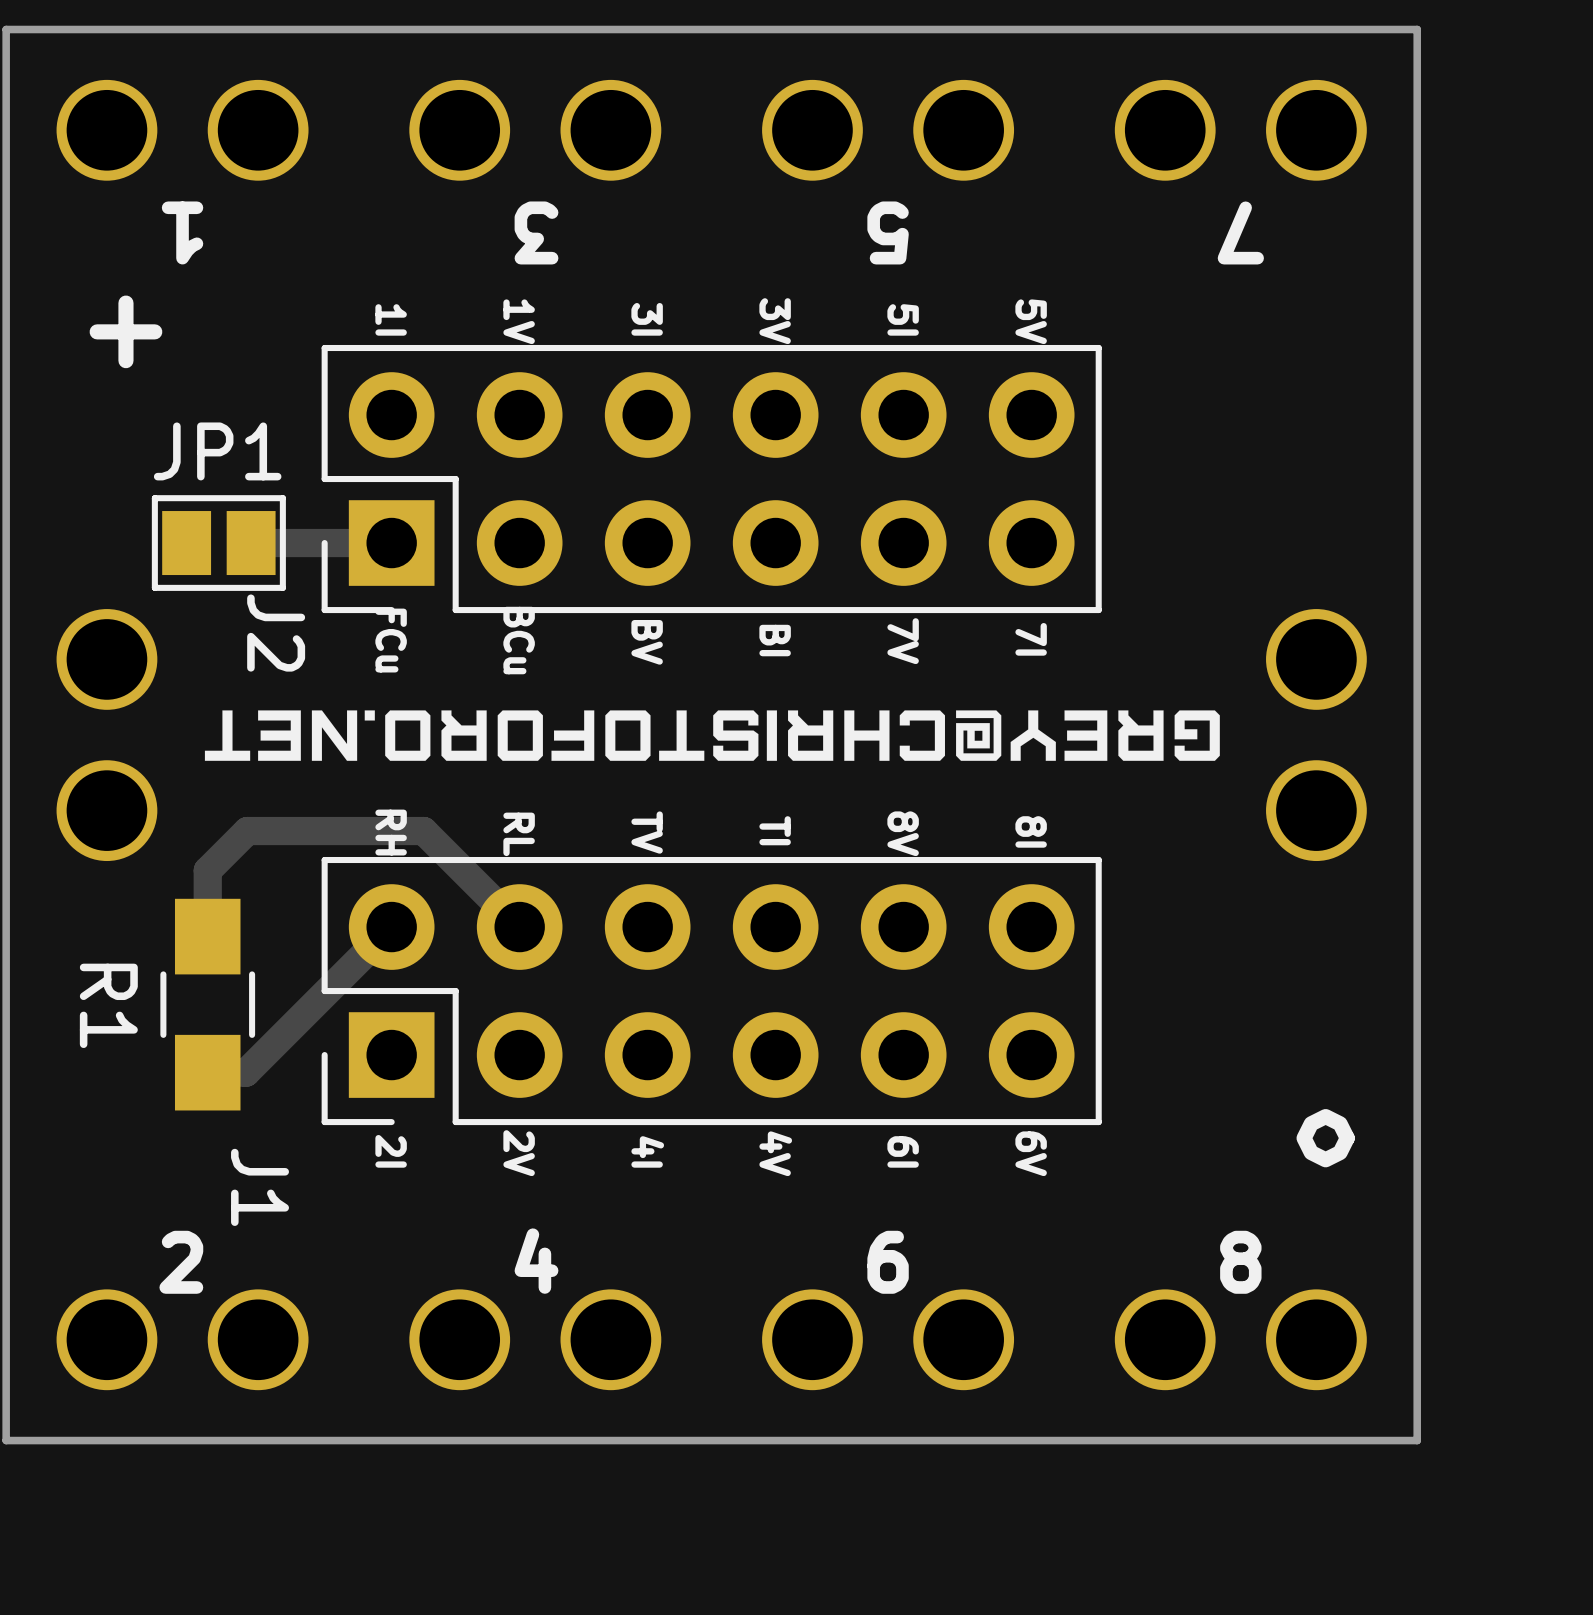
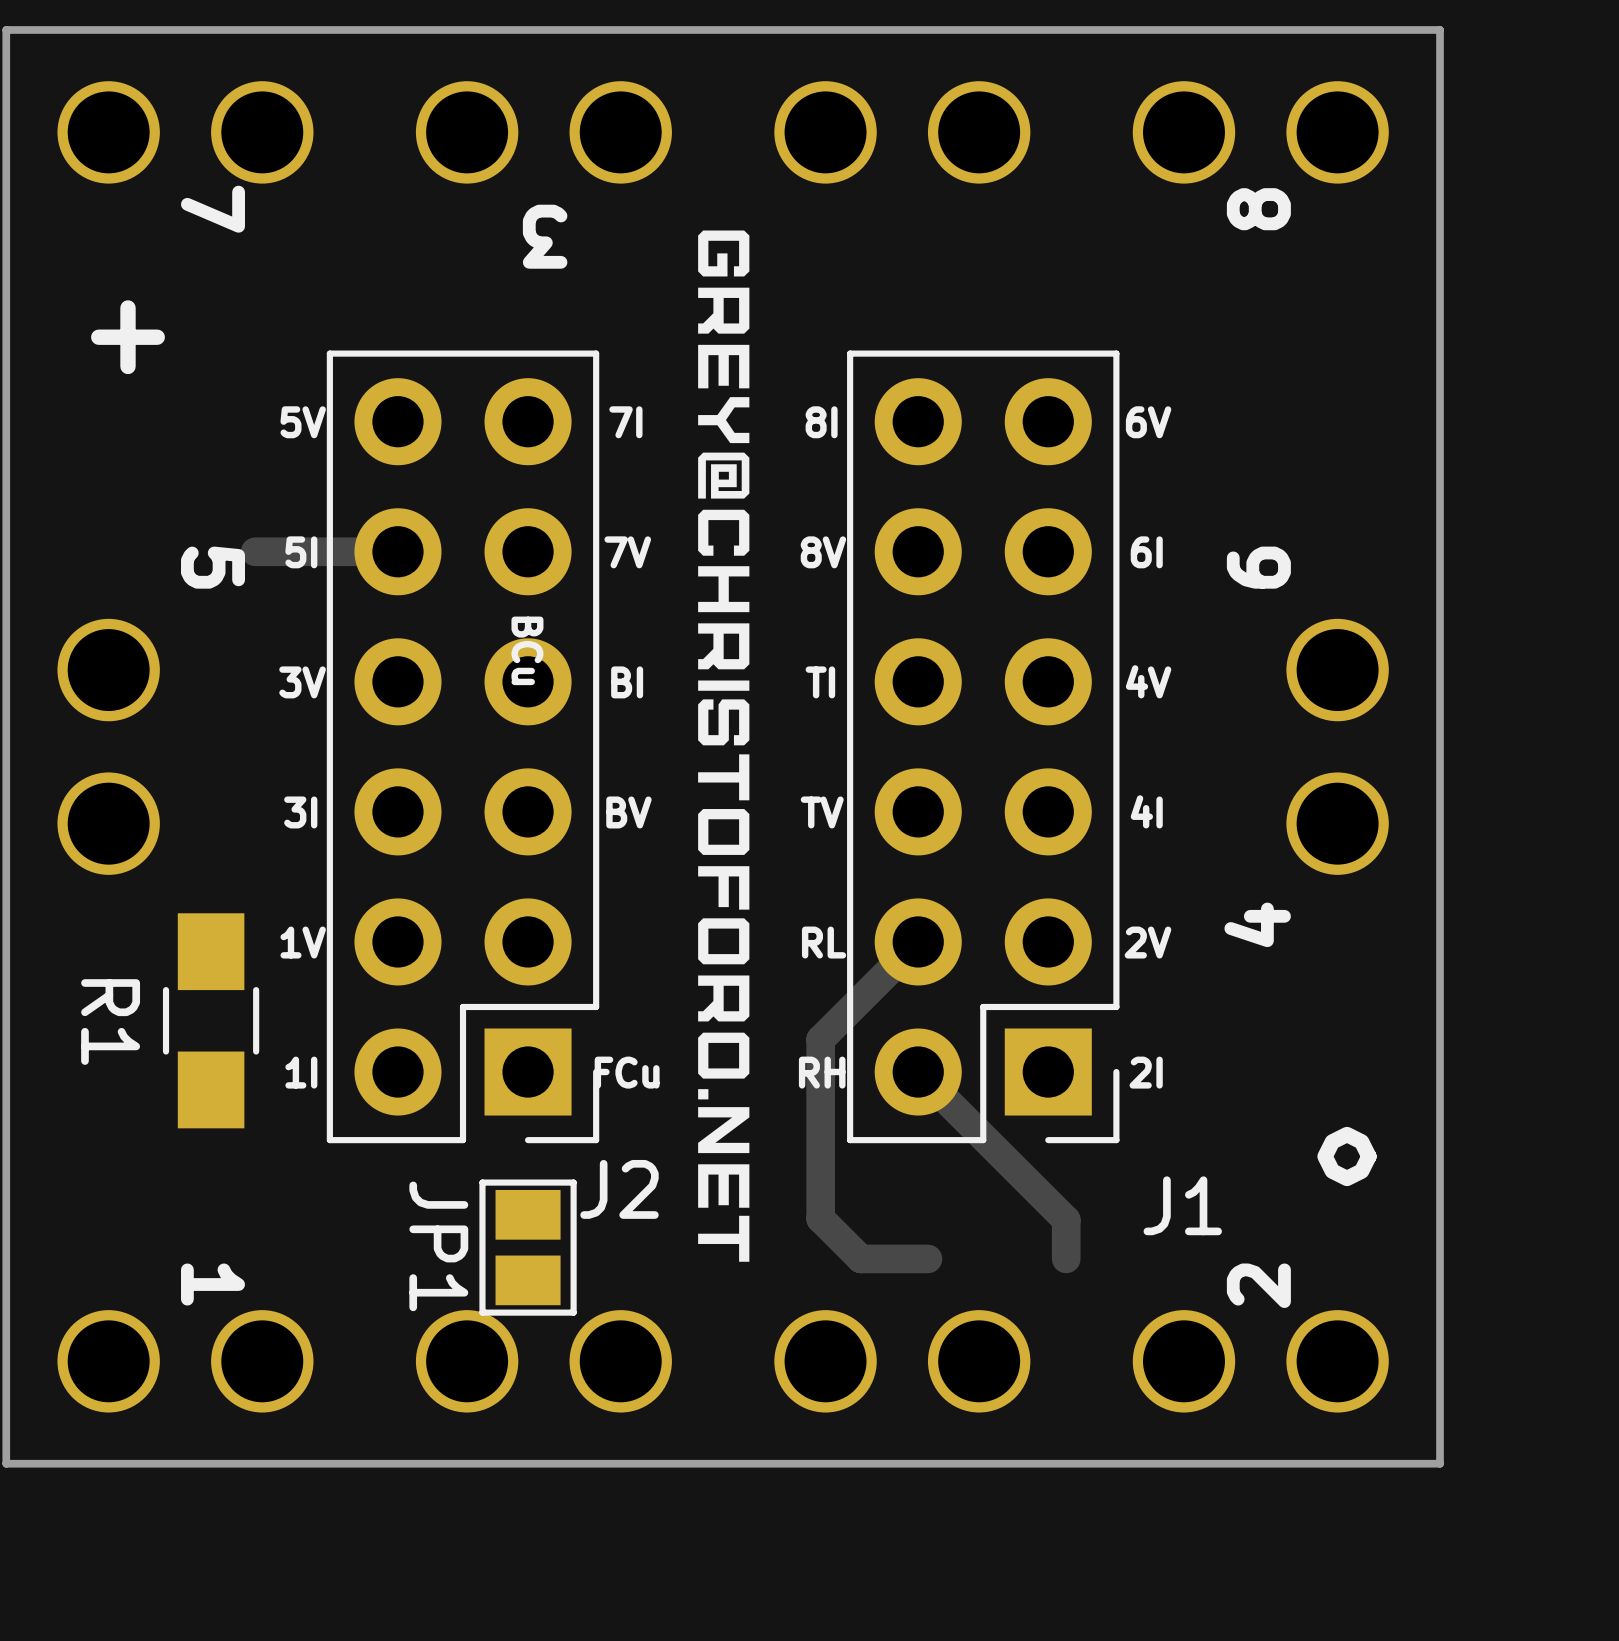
text: none -> 8 (1258, 209)
text rotation: 0° (182, 232) -> 90° counterclockwise (212, 1284)
text position: 1 (182, 232) -> 1 (212, 1284)
text rotation: 0° (888, 232) -> 90° counterclockwise (212, 567)
text position: 5 (888, 232) -> 5 (212, 567)
text rotation: 0° (1240, 232) -> 90° counterclockwise (212, 209)
text position: 7 (1240, 232) -> 7 (212, 209)
text rotation: 0° (391, 319) -> 90° counterclockwise (301, 1072)
text position: 1I (391, 319) -> 1I (301, 1072)
text rotation: 0° (647, 319) -> 90° counterclockwise (300, 812)
text position: 3I (647, 319) -> 3I (300, 812)
text rotation: 0° (903, 319) -> 90° counterclockwise (301, 552)
text position: 5I (903, 319) -> 5I (301, 552)
text rotation: 0° (519, 321) -> 90° counterclockwise (303, 942)
text position: 1V (519, 321) -> 1V (303, 942)
text rotation: 0° (775, 321) -> 90° counterclockwise (302, 682)
text position: 3V (775, 321) -> 3V (302, 682)
text rotation: 0° (1031, 321) -> 90° counterclockwise (303, 422)
text position: 5V (1031, 321) -> 5V (303, 422)
JP1 name position: JP1 (217, 451) -> JP1 (438, 1246)
J2 rotation: 0° (711, 479) -> 90° counterclockwise (463, 746)
JP1 rotation: 0° (218, 543) -> 90° clockwise (528, 1247)
JP1 position: (218, 543) -> (528, 1247)
text rotation: 0° (1031, 639) -> 90° counterclockwise (625, 422)
text position: 7I (1031, 639) -> 7I (625, 422)
text rotation: 0° (391, 640) -> 90° counterclockwise (627, 1072)
text position: FCu (391, 640) -> FCu (627, 1072)
text rotation: 0° (775, 640) -> 90° counterclockwise (627, 682)
text position: BI (775, 640) -> BI (627, 682)
text rotation: 0° (903, 641) -> 90° counterclockwise (627, 552)
text position: 7V (903, 641) -> 7V (627, 552)
text rotation: 0° (647, 642) -> 90° counterclockwise (628, 812)
text position: BV (647, 642) -> BV (628, 812)
drawing shape: [204, 710, 1220, 761] -> [698, 230, 750, 1262]
text rotation: 0° (775, 830) -> 90° counterclockwise (820, 682)
text position: TI (775, 830) -> TI (820, 682)
text rotation: 0° (1031, 831) -> 90° counterclockwise (821, 422)
text position: 8I (1031, 831) -> 8I (821, 422)
text rotation: 0° (391, 832) -> 90° counterclockwise (822, 1072)
text position: RH (391, 832) -> RH (822, 1072)
text rotation: 0° (647, 832) -> 90° counterclockwise (822, 812)
text position: TV (647, 832) -> TV (822, 812)
text rotation: 0° (903, 833) -> 90° counterclockwise (823, 552)
text position: 8V (903, 833) -> 8V (823, 552)
text rotation: 0° (519, 834) -> 90° counterclockwise (824, 942)
text position: RL (519, 834) -> RL (824, 942)
track: (391, 927) (246, 1072) (207, 1072) -> none
track: (519, 927) (423, 831) (247, 831) (207, 870) (207, 936) -> none
track: none -> (918, 941) (820, 1039) (820, 1218) (860, 1258) (927, 1258)
J1 rotation: 0° (711, 991) -> 90° counterclockwise (983, 746)
track: none -> (918, 1072) (1066, 1220) (1066, 1258)
text rotation: 0° (391, 1151) -> 90° counterclockwise (1146, 1072)
text position: 2I (391, 1151) -> 2I (1146, 1072)
text rotation: 0° (647, 1151) -> 90° counterclockwise (1146, 811)
text position: 4I (647, 1151) -> 4I (1146, 811)
text rotation: 0° (903, 1151) -> 90° counterclockwise (1146, 552)
text position: 6I (903, 1151) -> 6I (1146, 552)
text rotation: 0° (519, 1153) -> 90° counterclockwise (1147, 942)
text position: 2V (519, 1153) -> 2V (1147, 942)
text rotation: 0° (775, 1153) -> 90° counterclockwise (1148, 681)
text position: 4V (775, 1153) -> 4V (1148, 681)
text rotation: 0° (1031, 1153) -> 90° counterclockwise (1148, 422)
text position: 6V (1031, 1153) -> 6V (1148, 422)
text rotation: 0° (536, 1261) -> 90° counterclockwise (1257, 924)
text position: 4 (536, 1261) -> 4 (1257, 924)
text: 2 (181, 1262) -> none
text rotation: 0° (888, 1262) -> 90° counterclockwise (1258, 567)
text position: 6 (888, 1262) -> 6 (1258, 567)
text: 8 (1240, 1262) -> 2 (1258, 1285)

